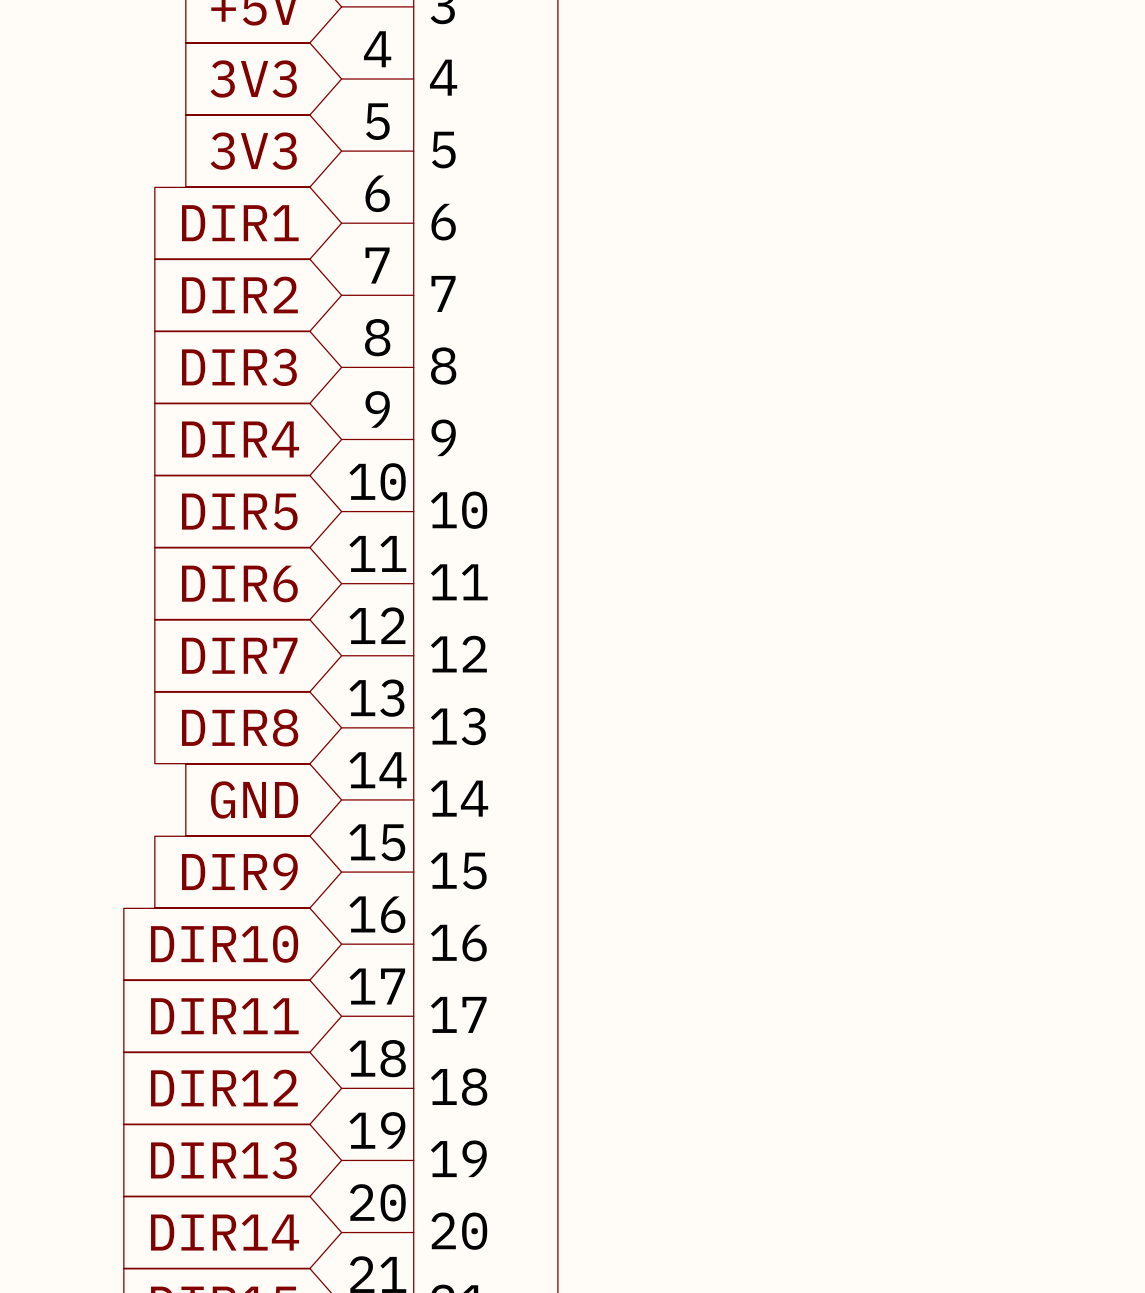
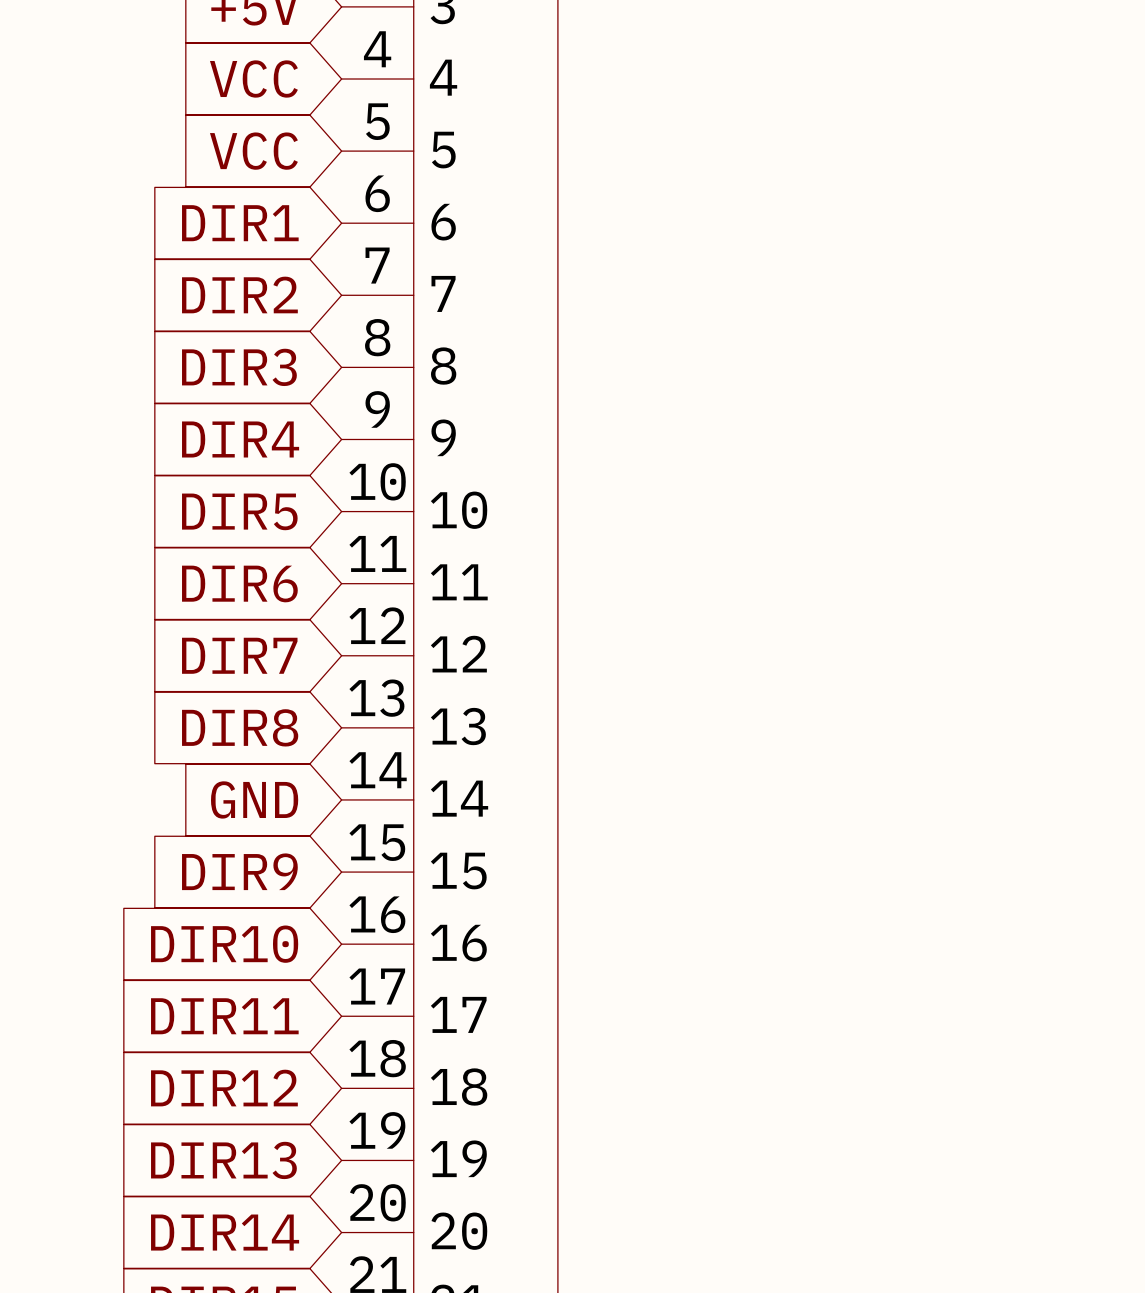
global label: 3V3 (253, 79) -> VCC (253, 79)
global label: 3V3 (253, 151) -> VCC (253, 151)

